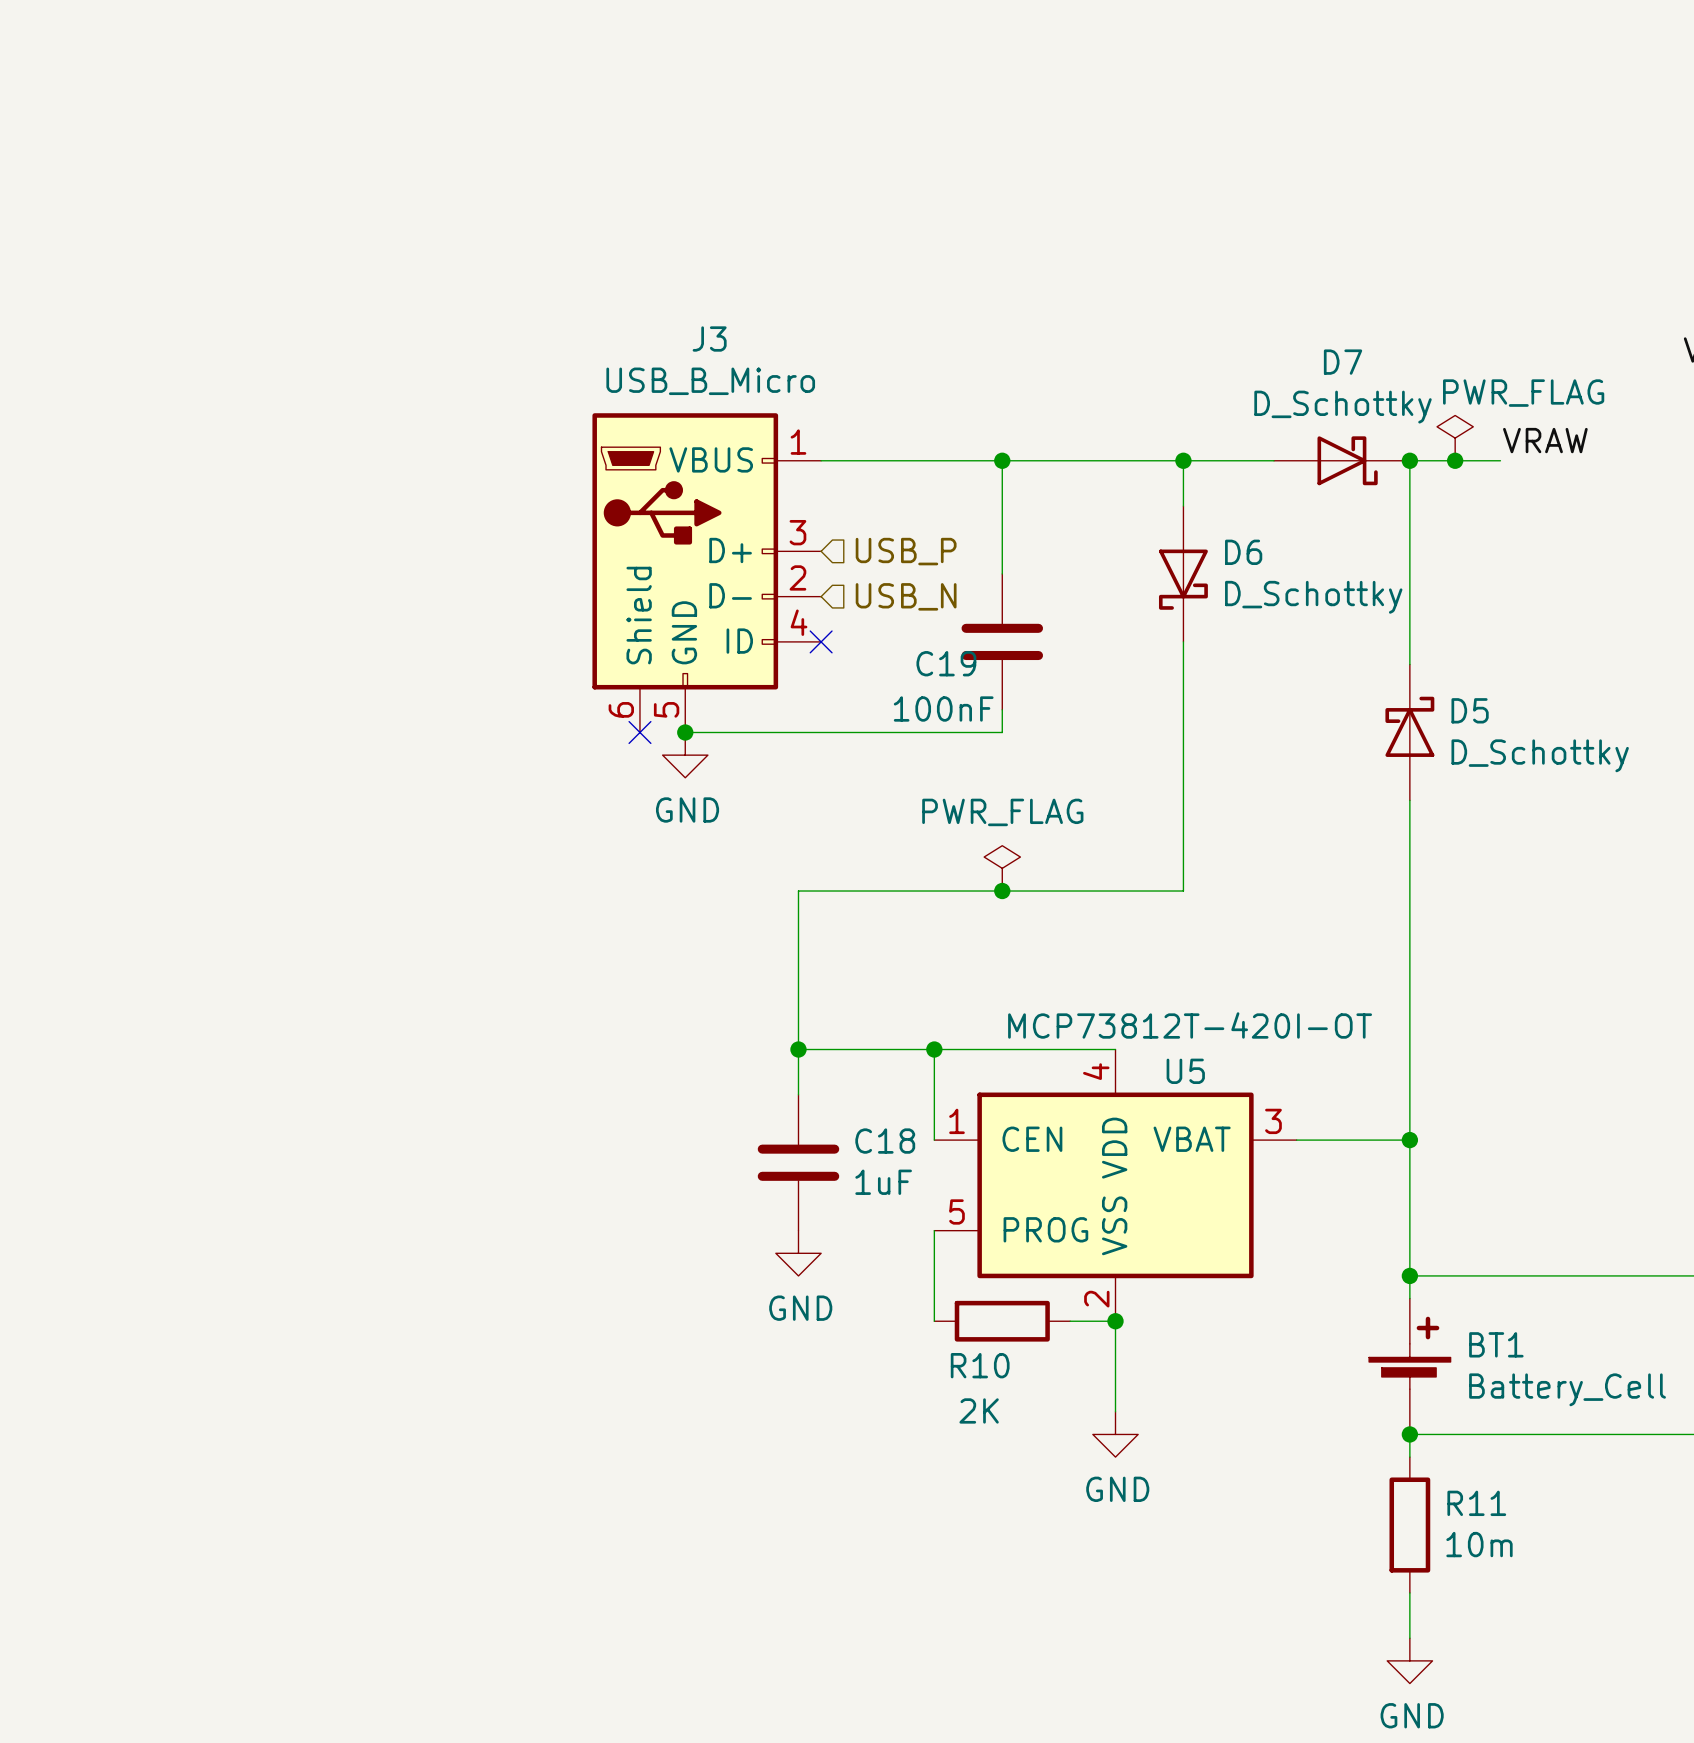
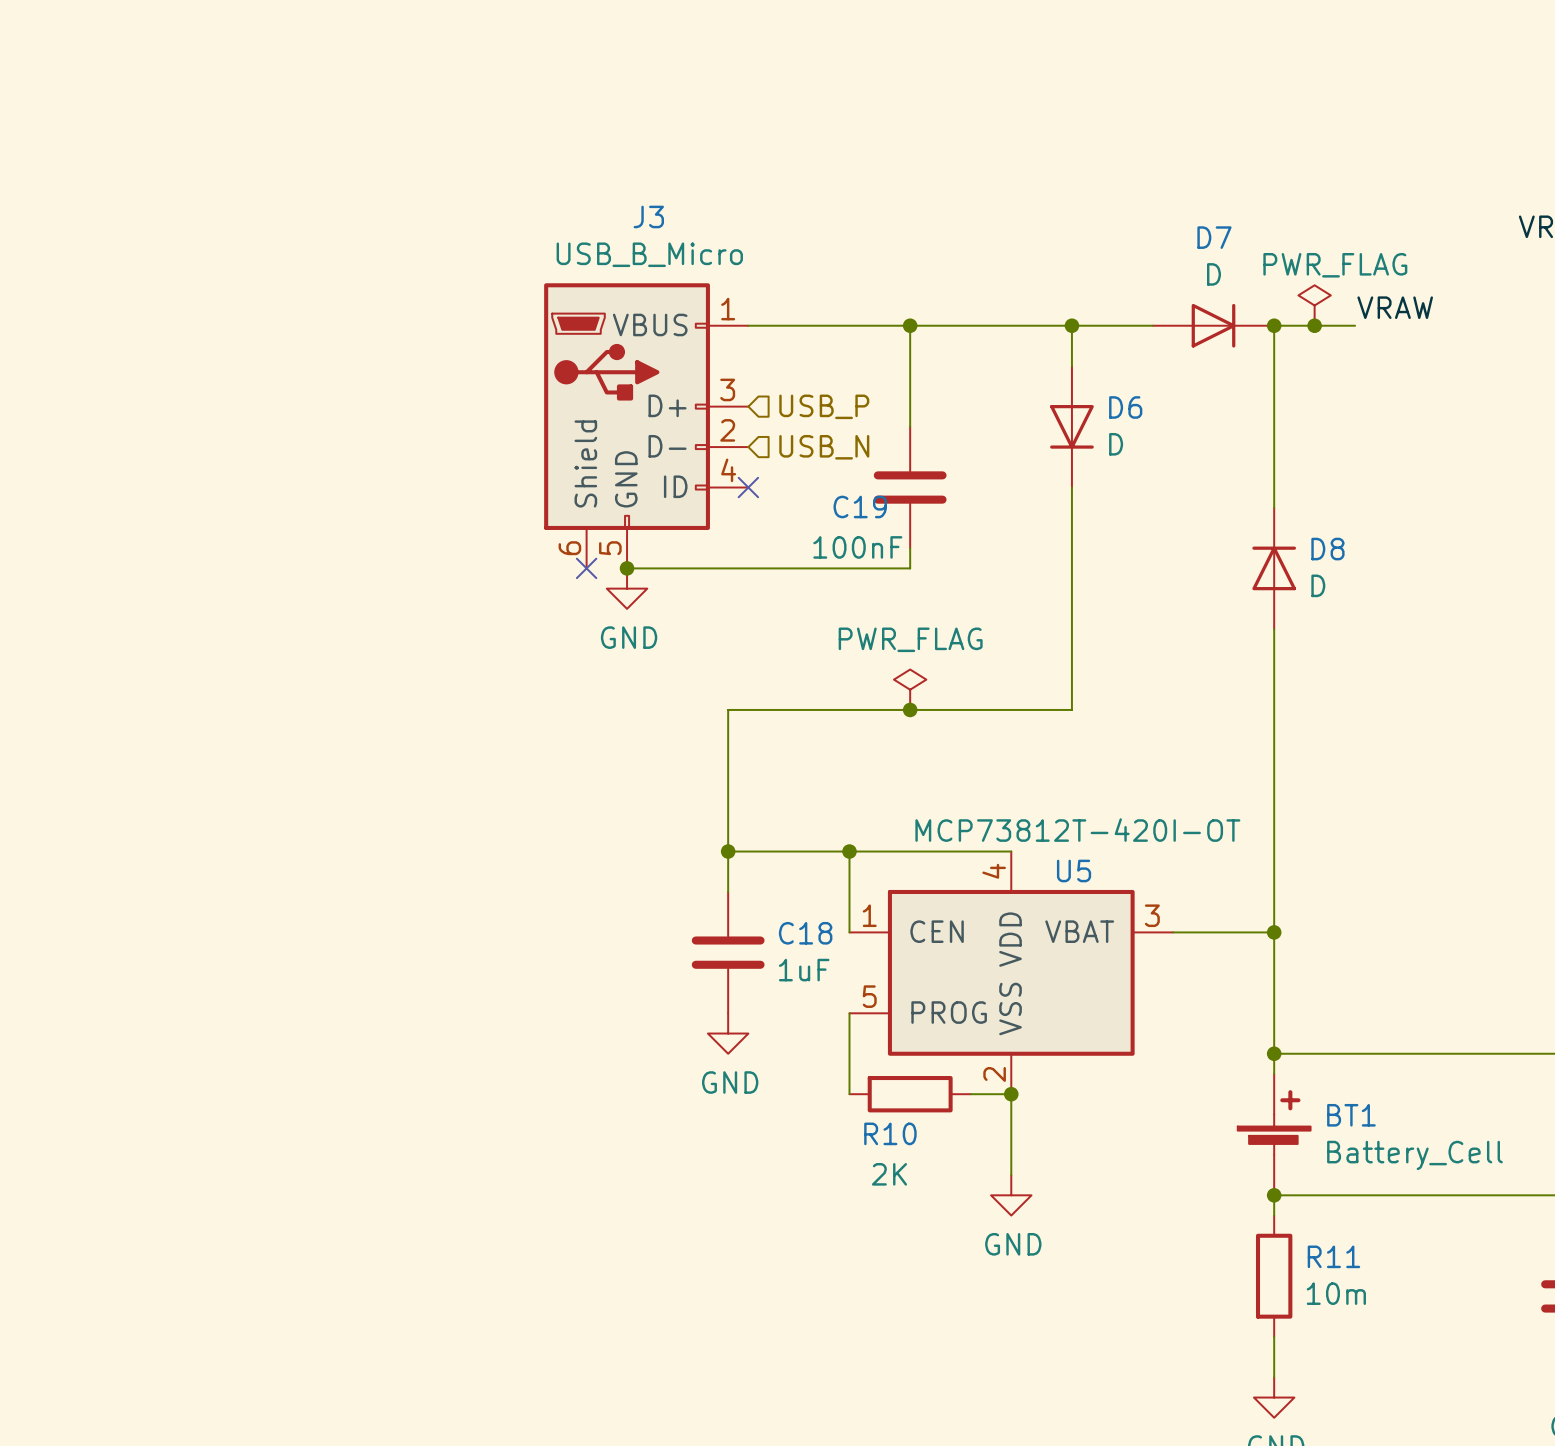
power symbol text position: PWR_FLAG (1523, 393) -> PWR_FLAG (1335, 265)
D7 value: D_Schottky (1343, 407) -> D (1213, 274)
D7 symbol: [1274, 436, 1410, 486] -> [1152, 303, 1275, 348]
D6 symbol: [1158, 506, 1208, 642] -> [1050, 366, 1094, 488]
D6 value: D_Schottky (1313, 597) -> D (1116, 444)
D5: D_Schottky (1409, 732) -> none
D8: none -> D (1274, 568)

